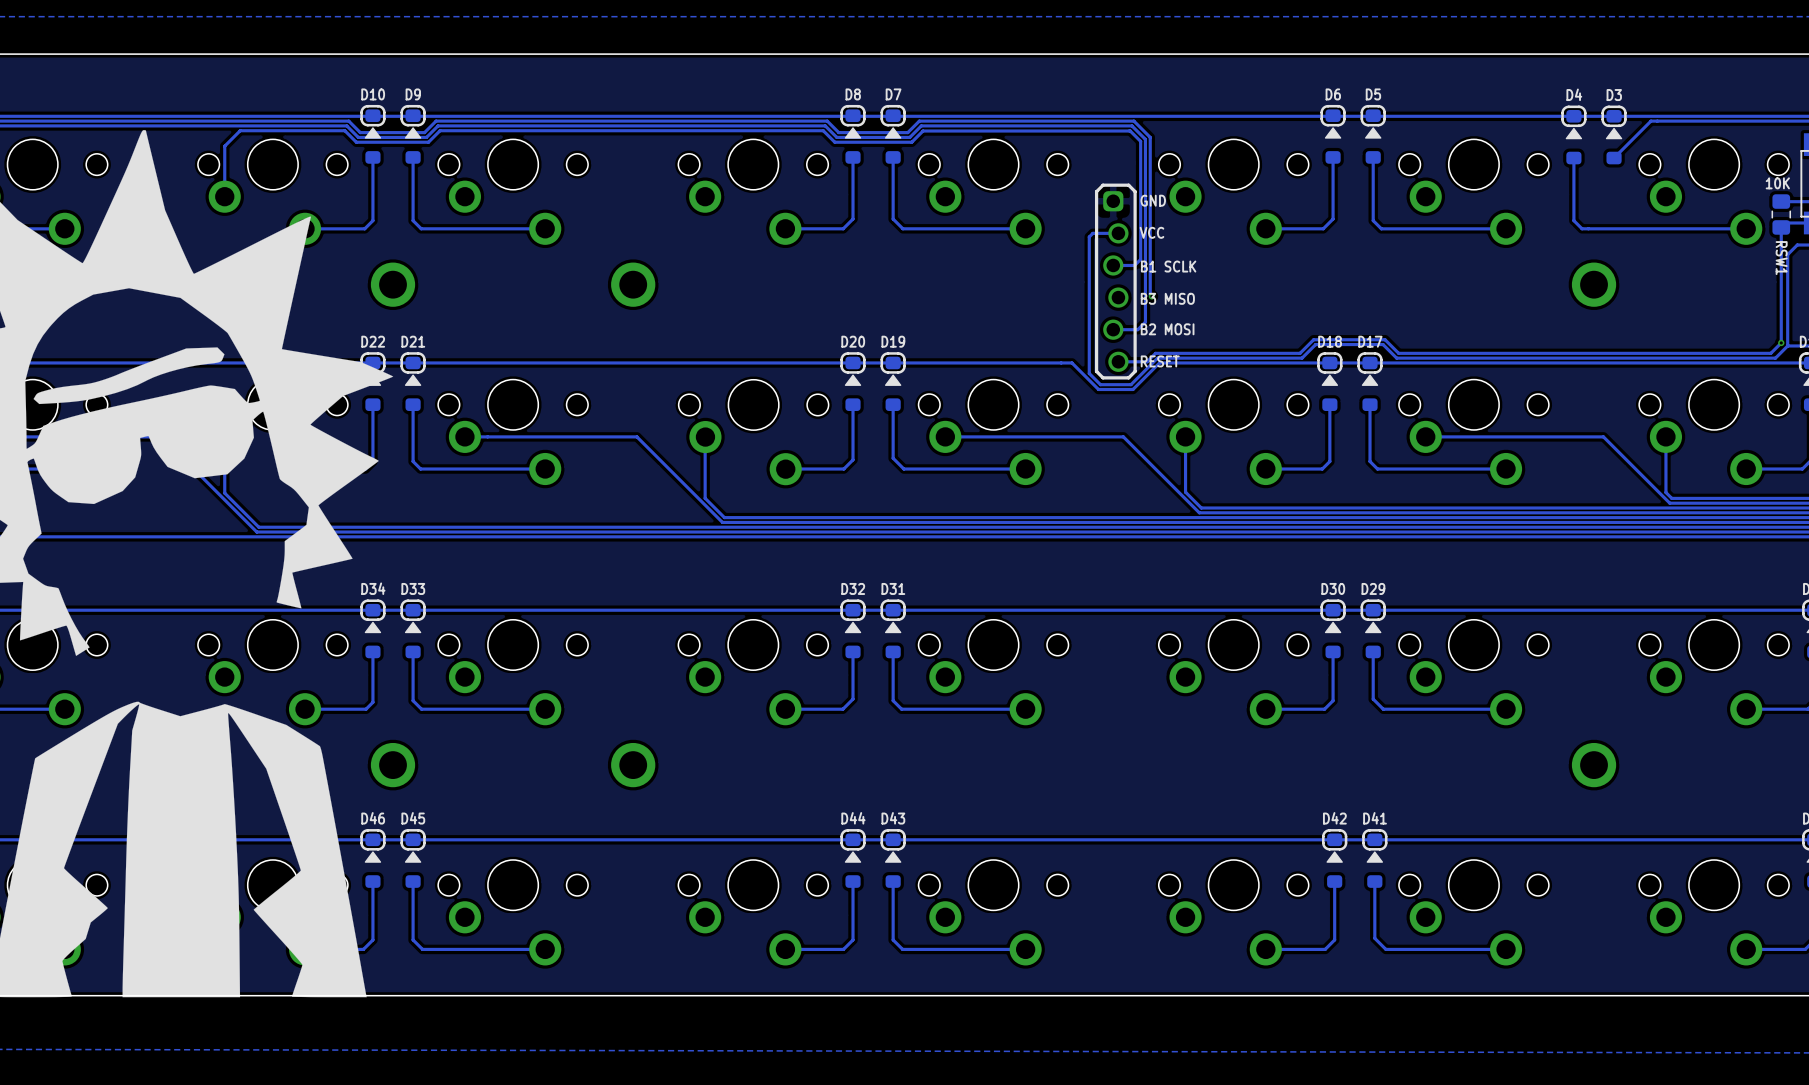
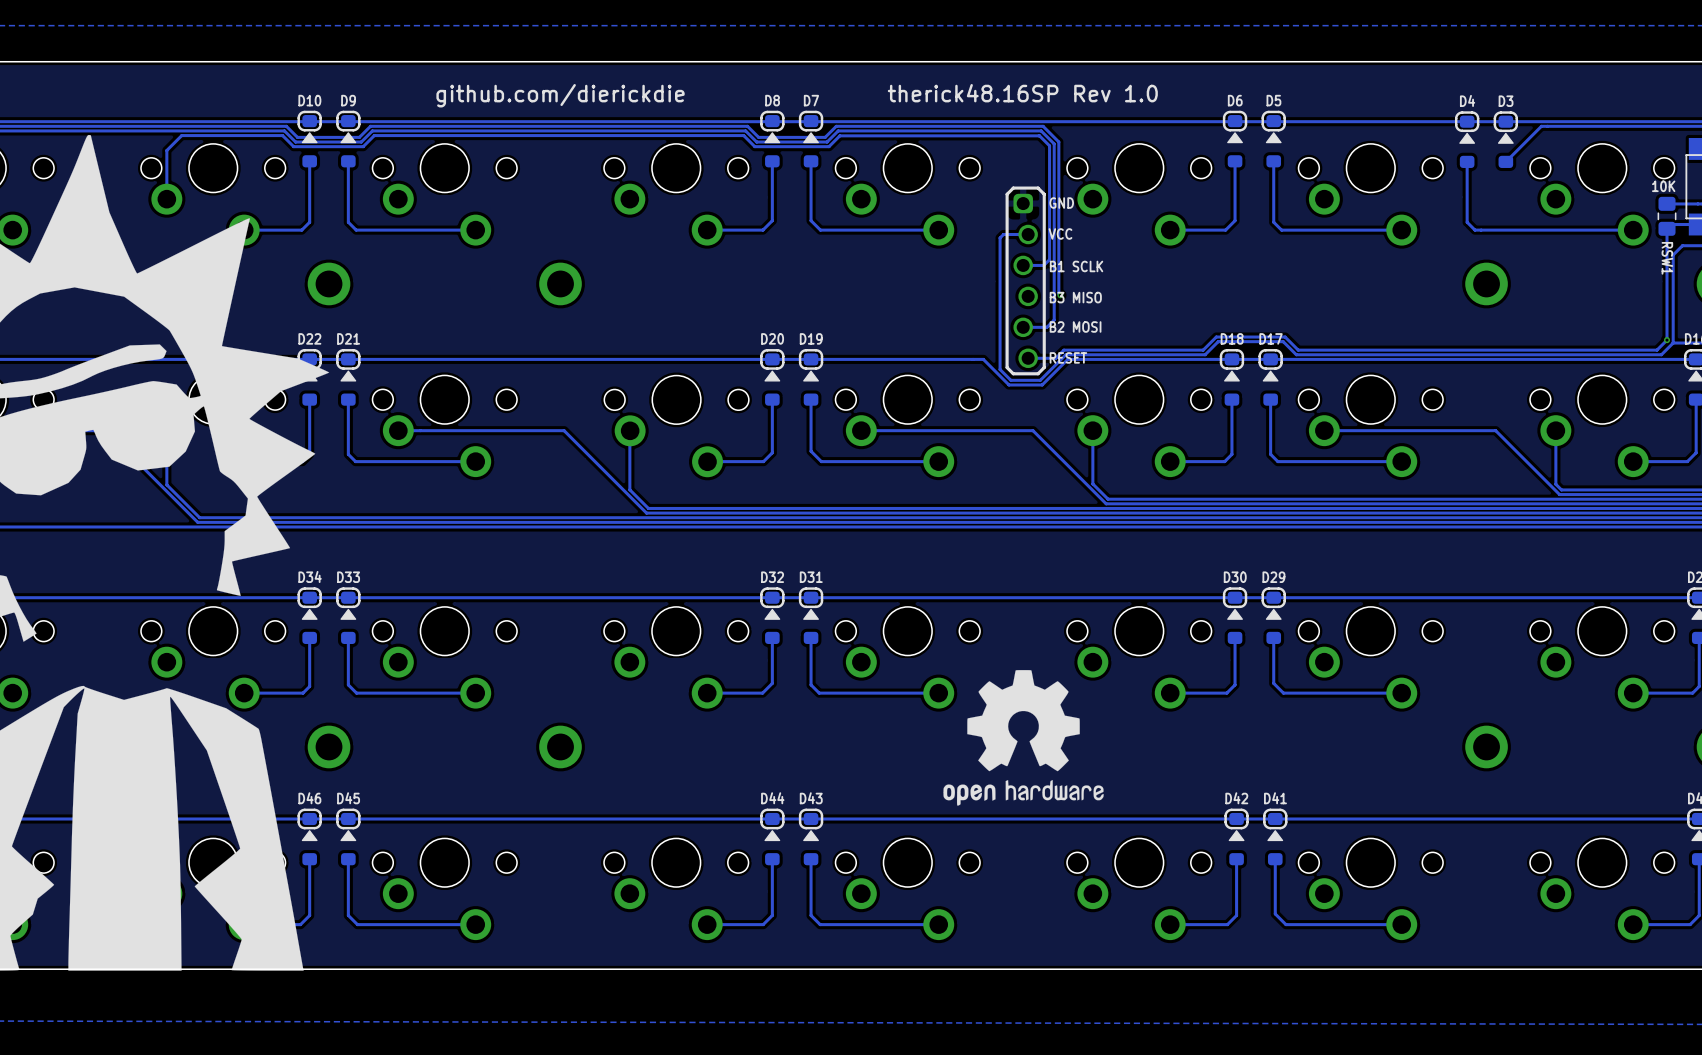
text: none -> therick48.16SP Rev 1.0 (1022, 93)
text: none -> github.com/dierickdie (560, 95)
drawing: none -> [943, 670, 1104, 806]

